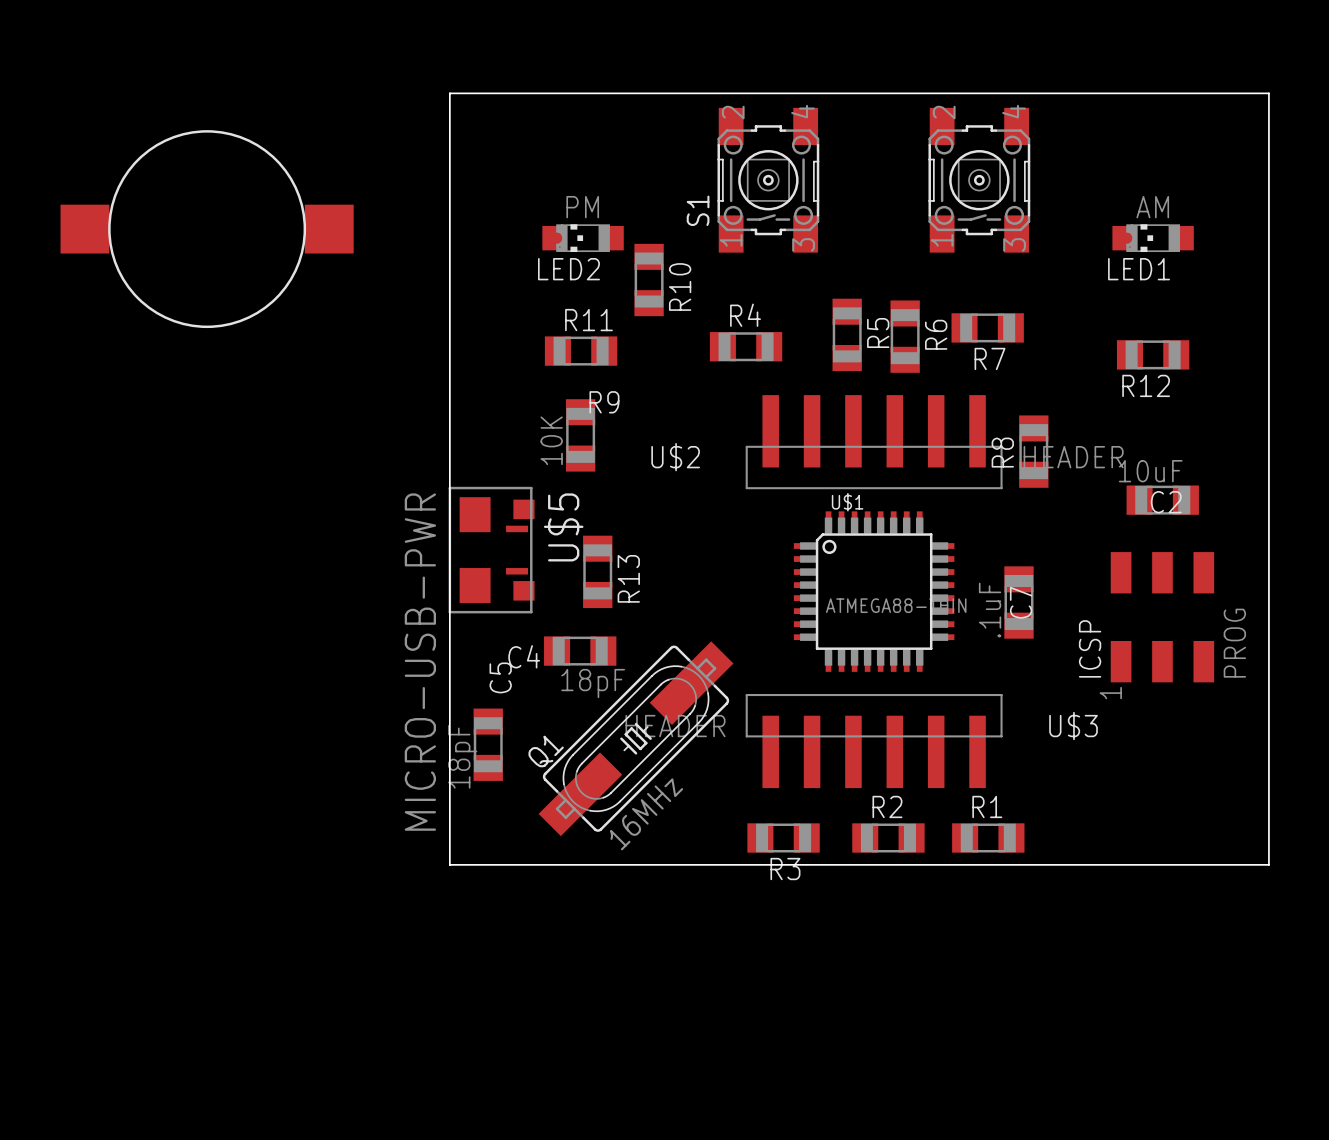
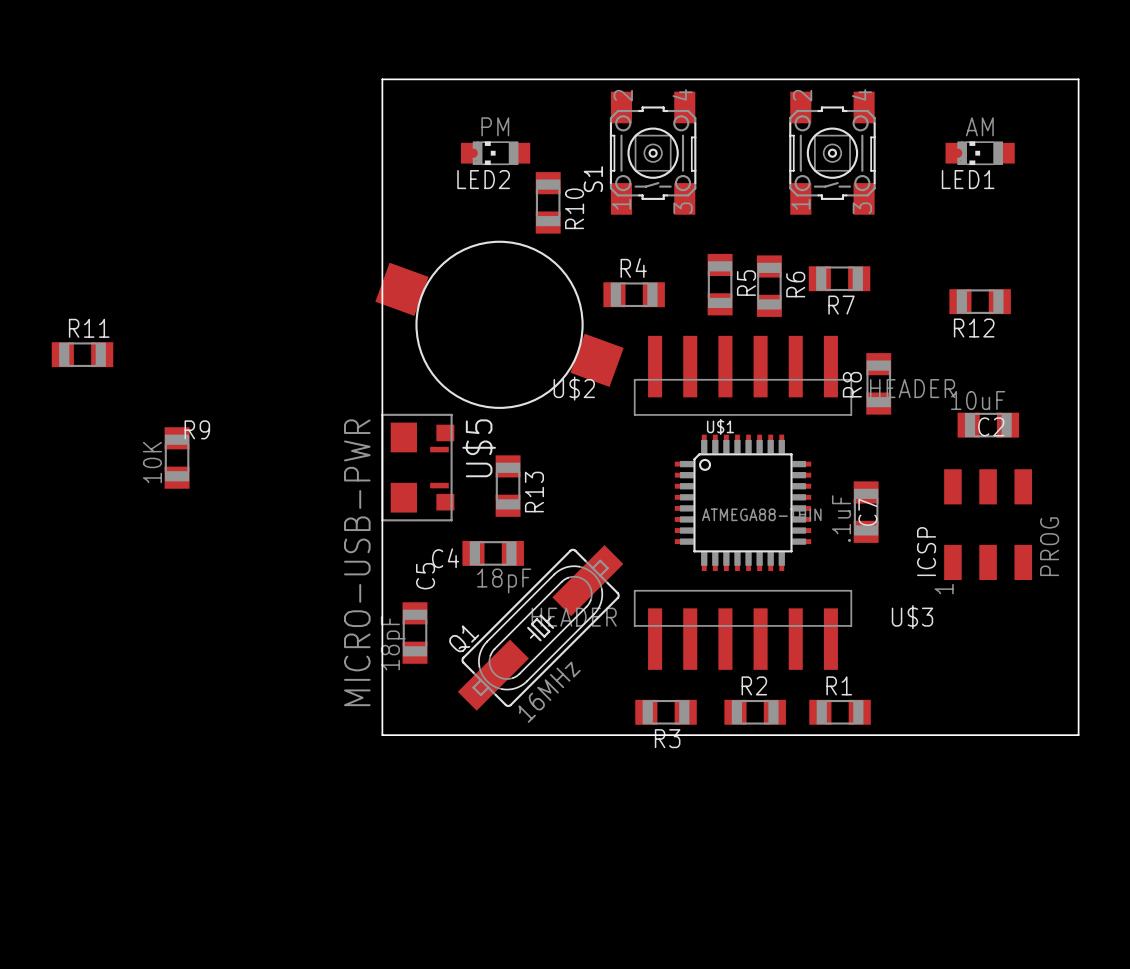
part: (207, 229) -> none
LED2 position: (583, 238) -> (495, 153)
LED1 position: (1153, 238) -> (980, 153)
R10 position: (649, 280) -> (548, 202)
R11 position: (581, 351) -> (82, 354)
part: none -> (499, 324)
R9 position: (580, 435) -> (177, 457)

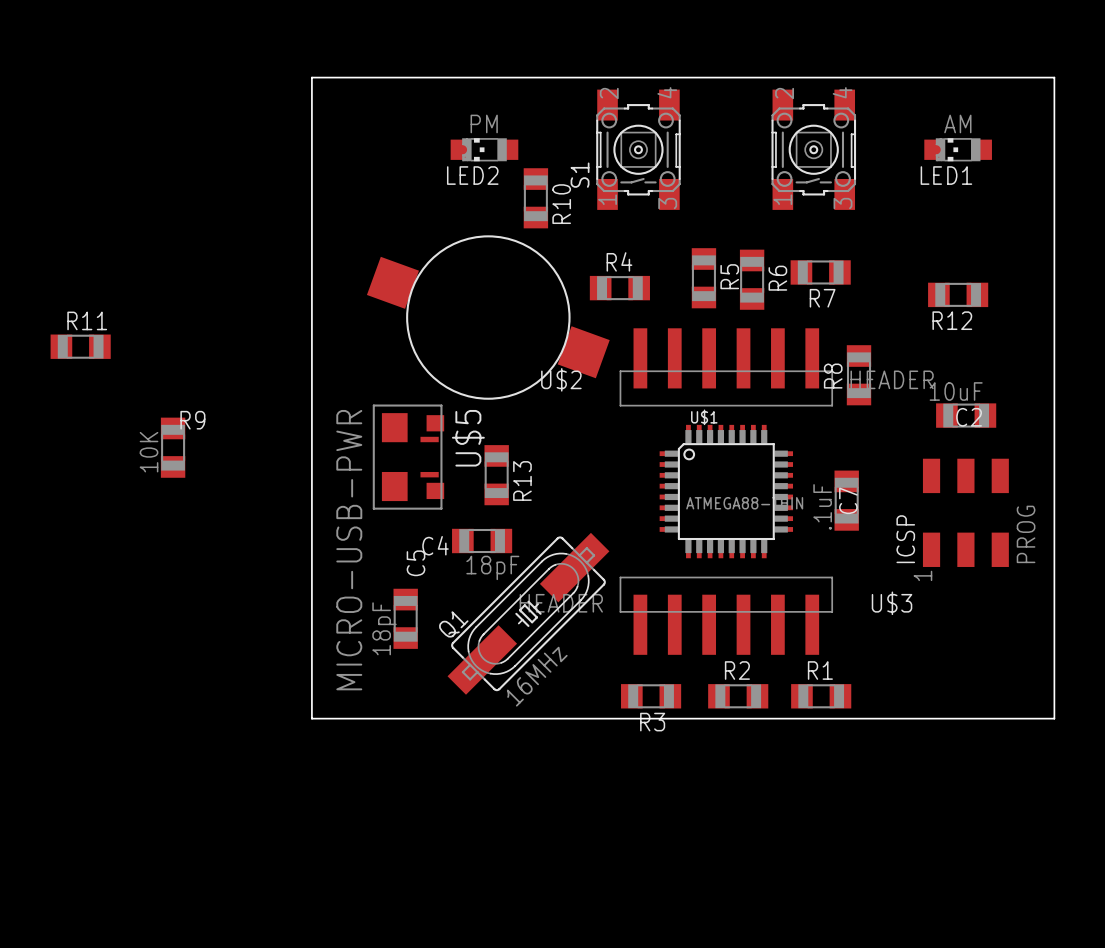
board edge: (382, 79) (382, 735) -> (373, 77) (311, 77) (311, 718) (373, 718)

